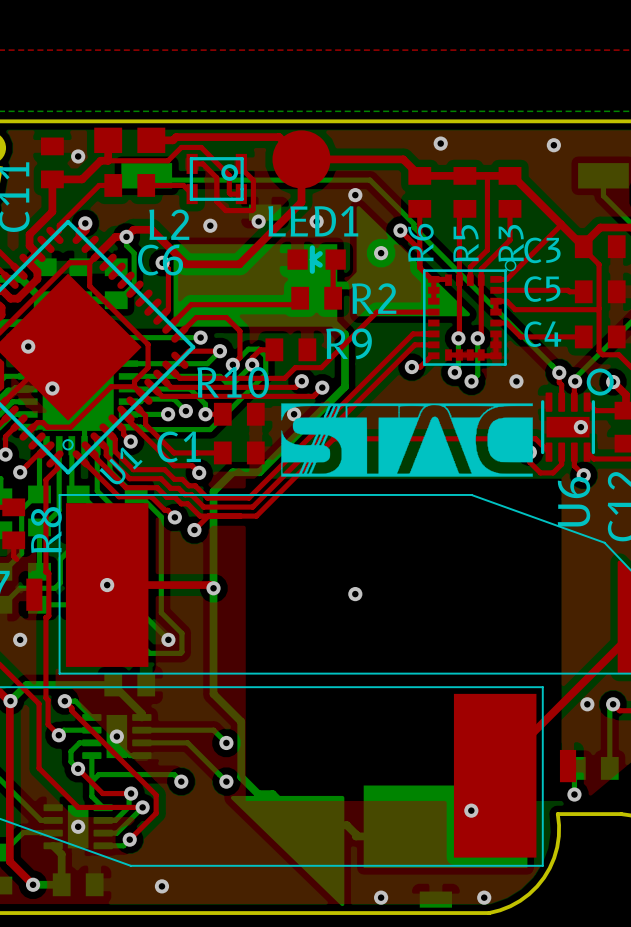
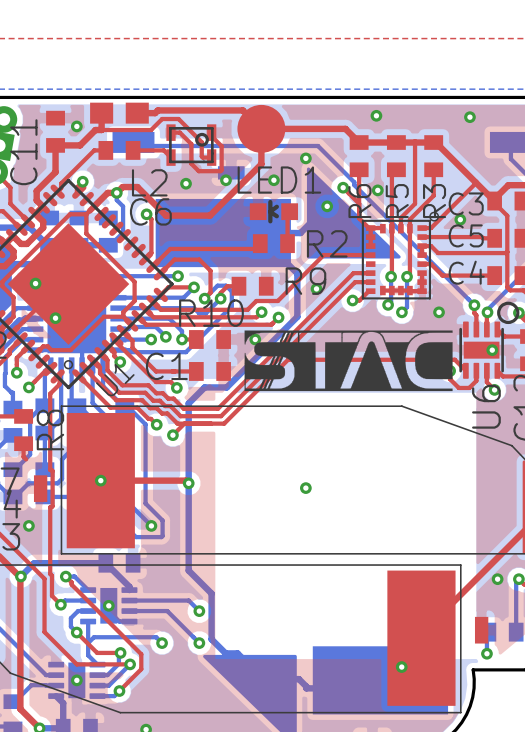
via: none -> (377, 190)
via: none -> (460, 219)
via: none -> (316, 288)

